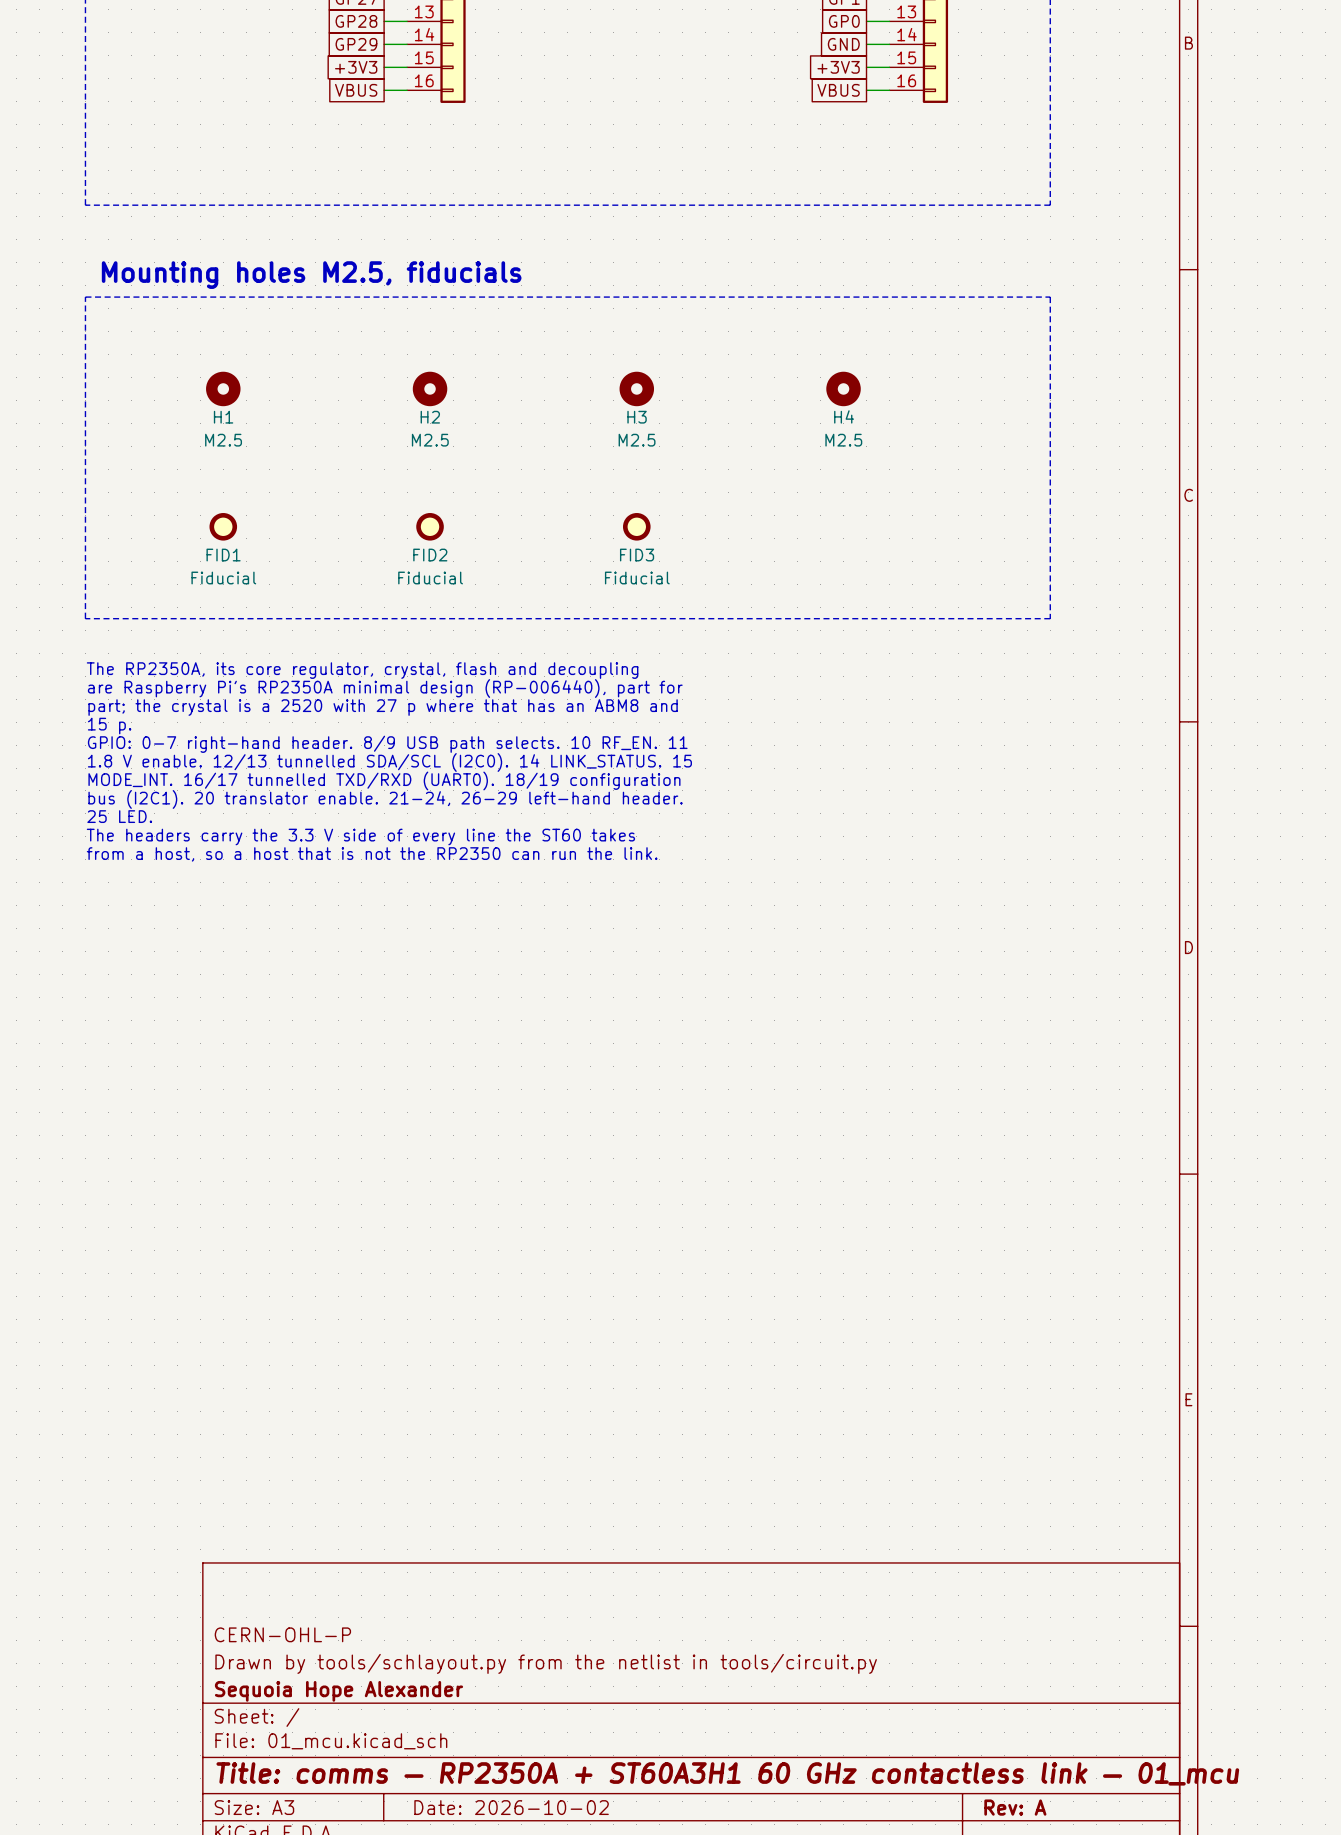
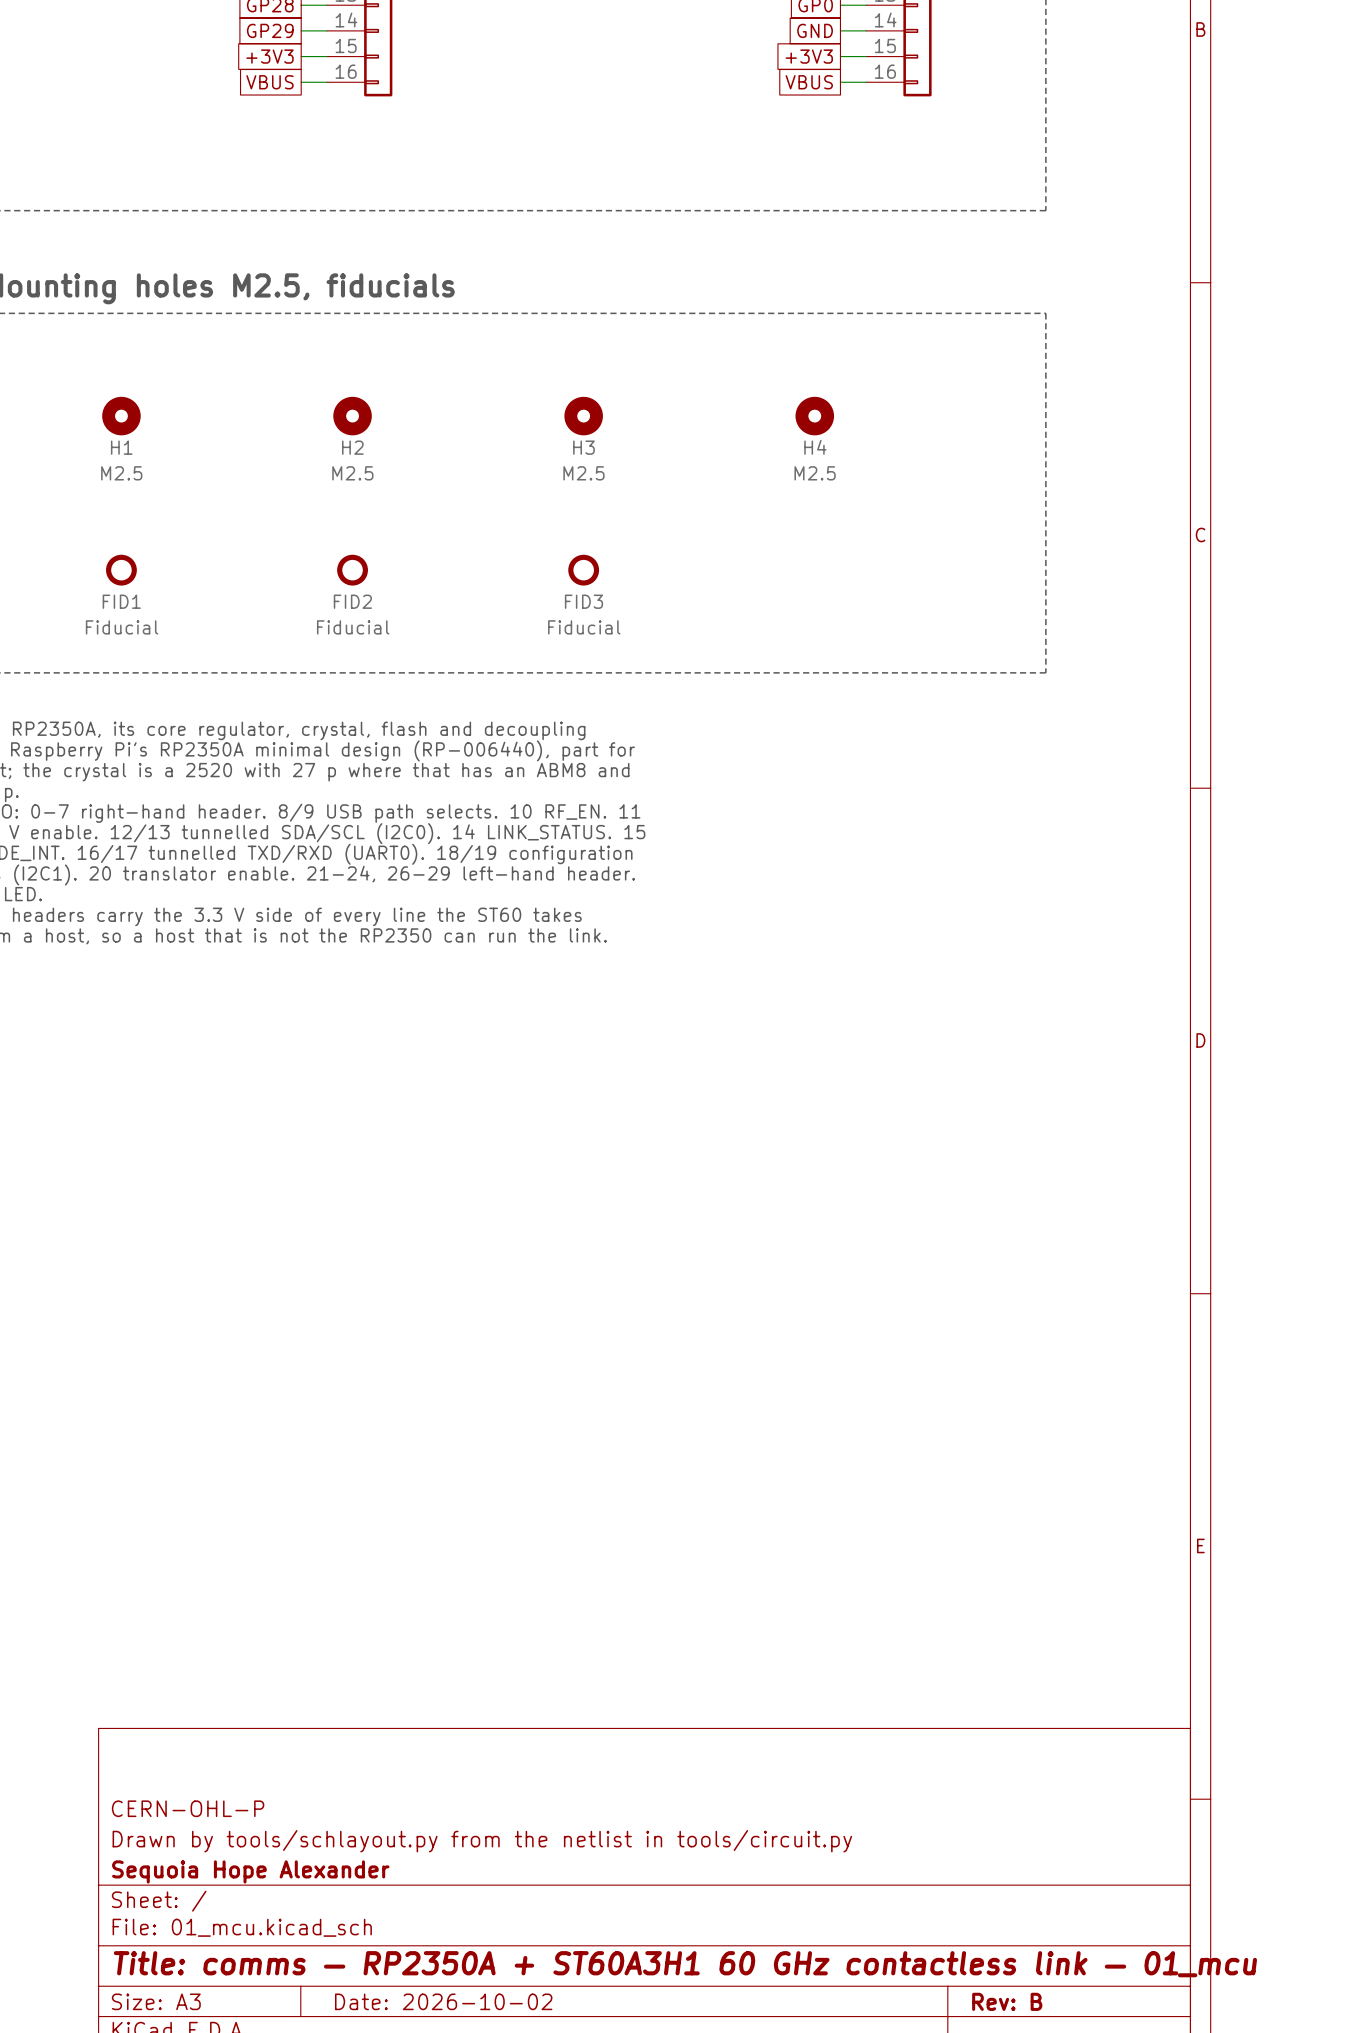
title block: Rev: A (1015, 1807) -> Rev: B (1007, 2001)

